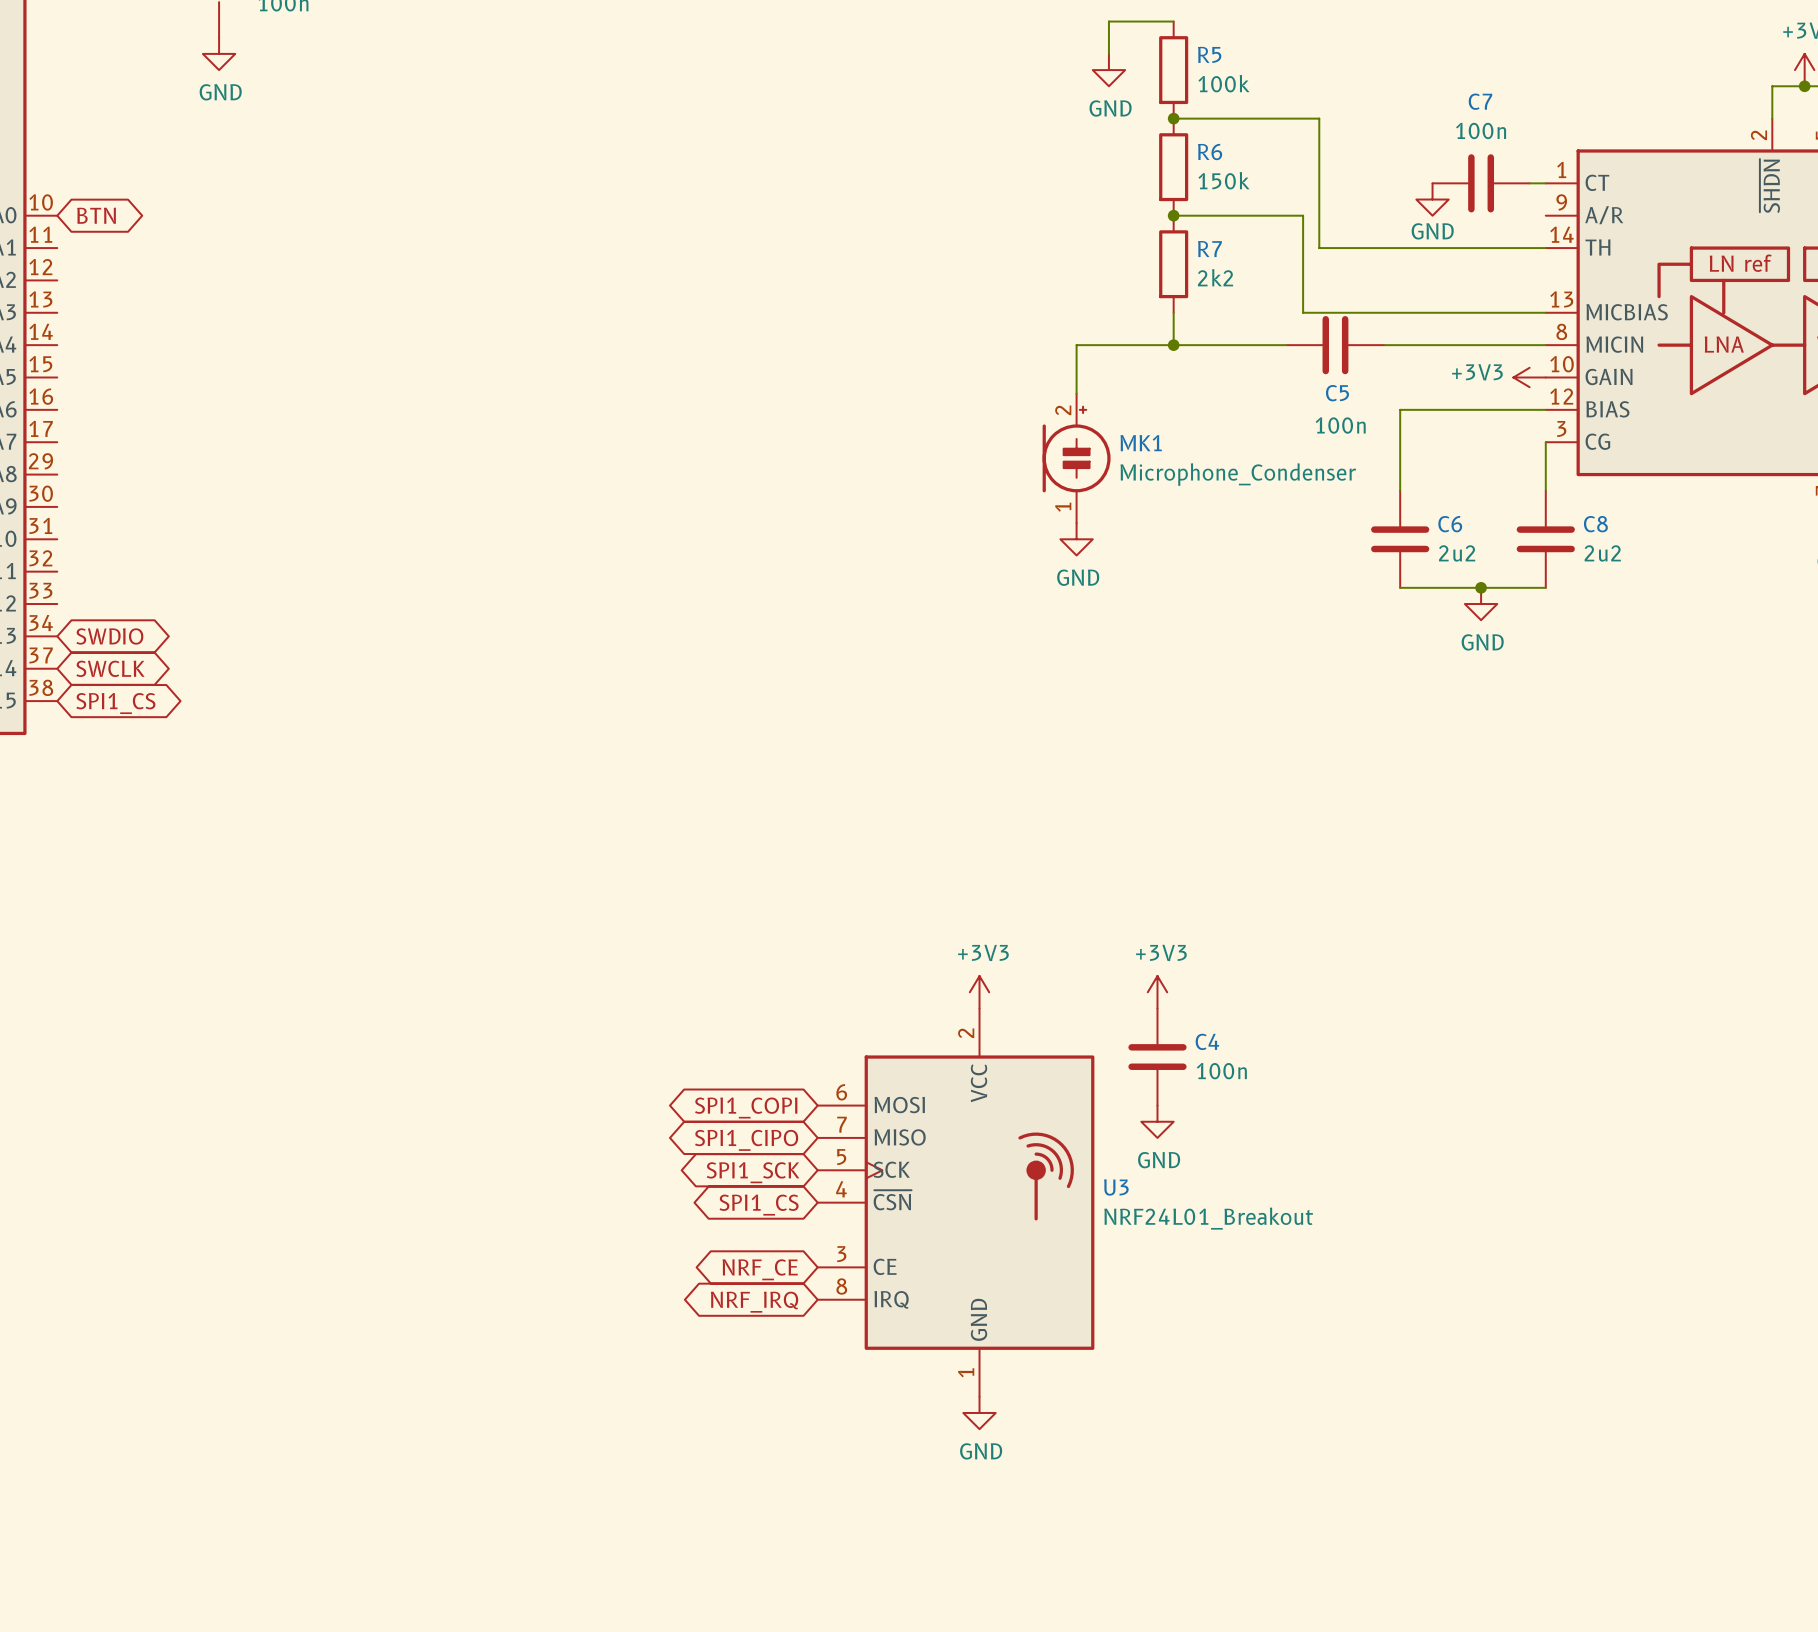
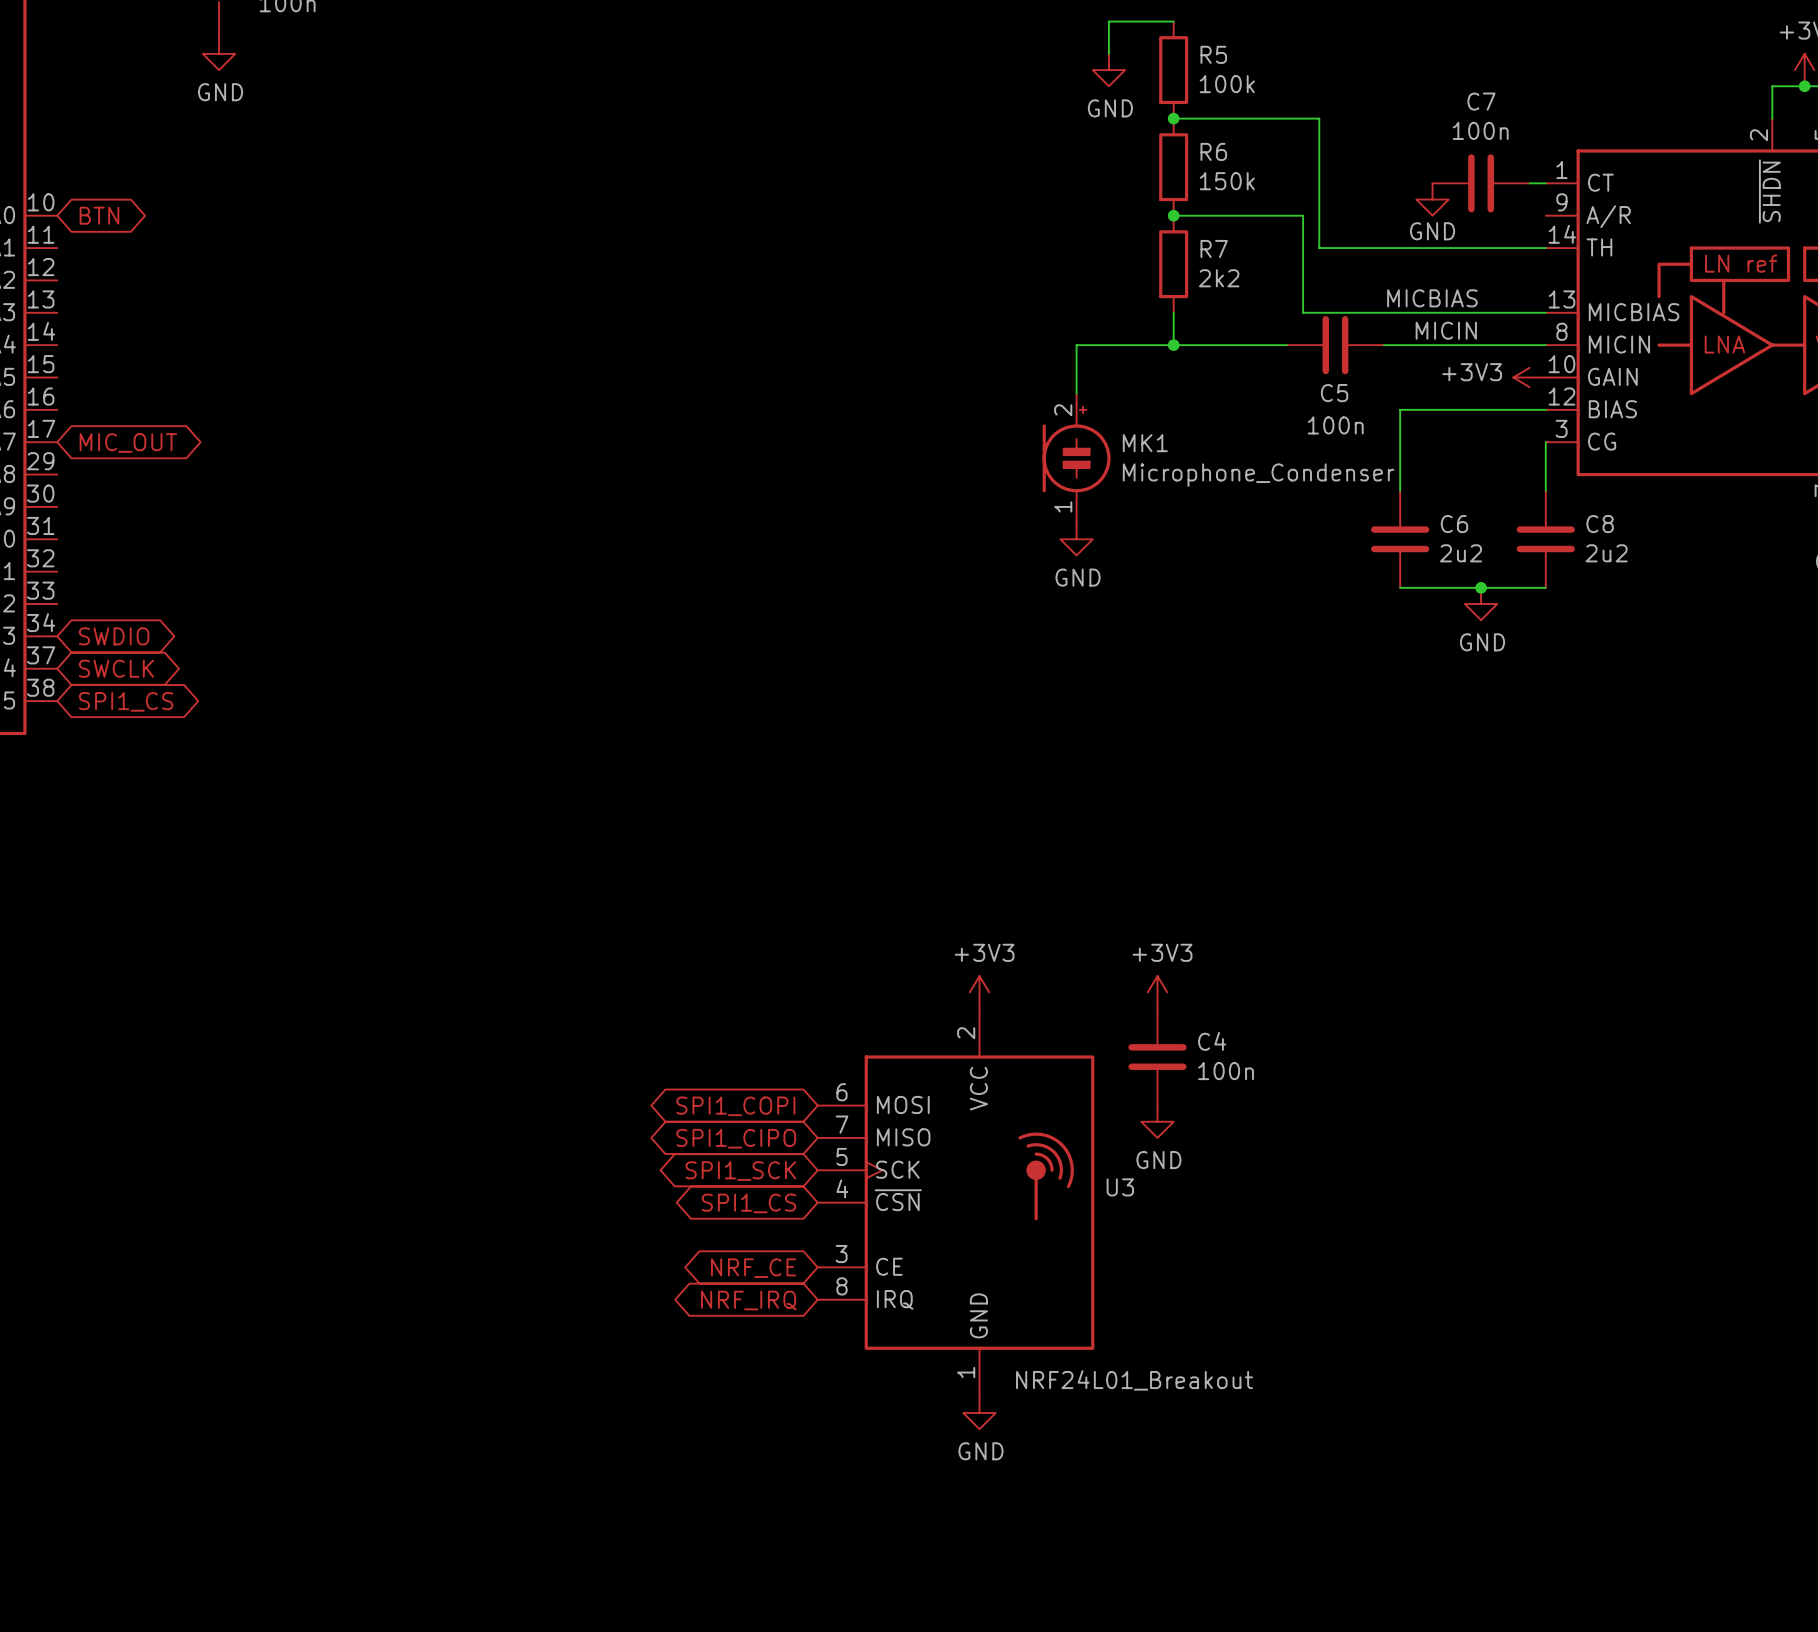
label: none -> MICBIAS (1432, 298)
label: none -> MICIN (1446, 330)
global label: none -> MIC_OUT (128, 442)
U3 value position: NRF24L01_Breakout (1208, 1218) -> NRF24L01_Breakout (1134, 1380)

